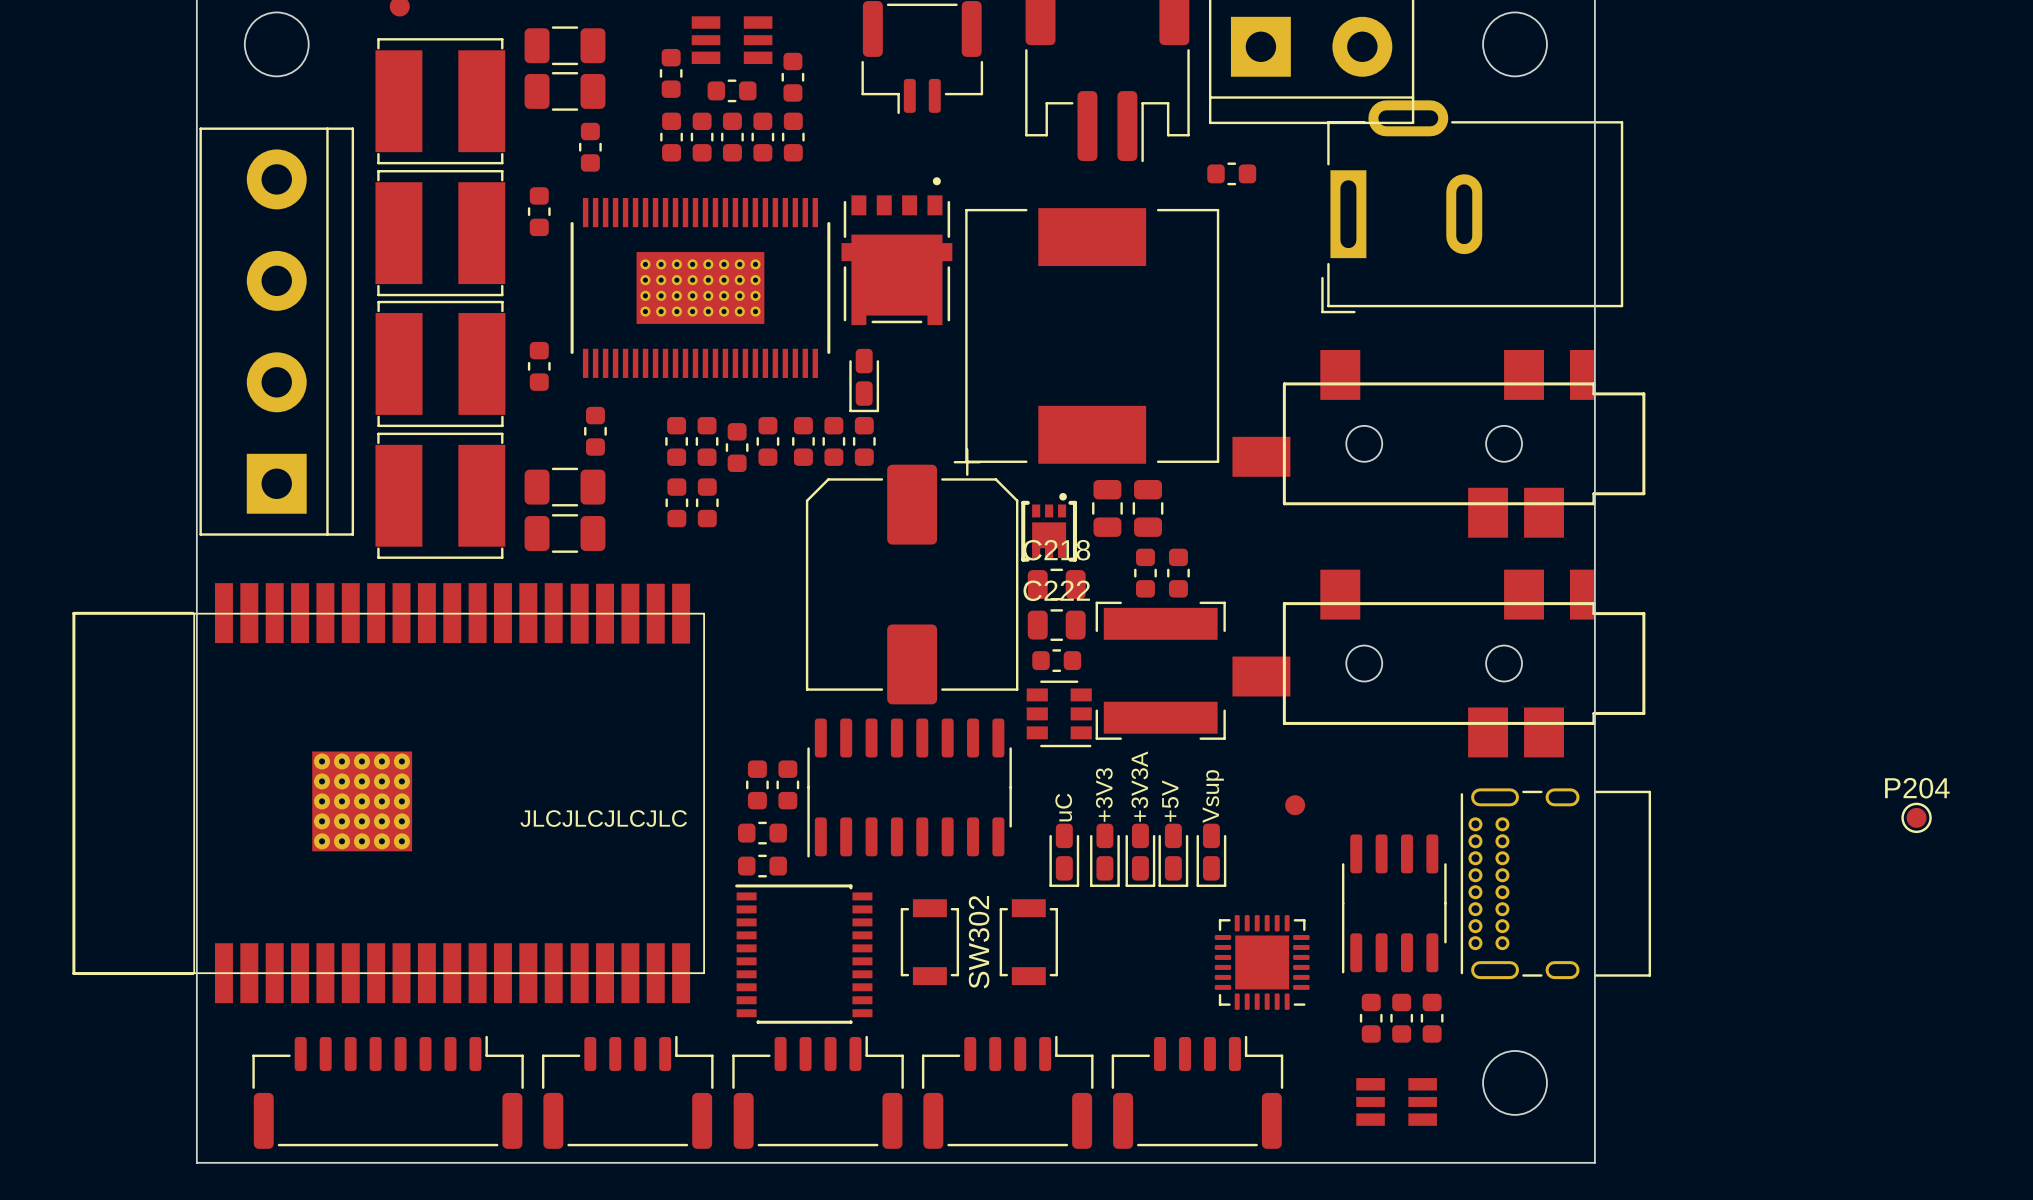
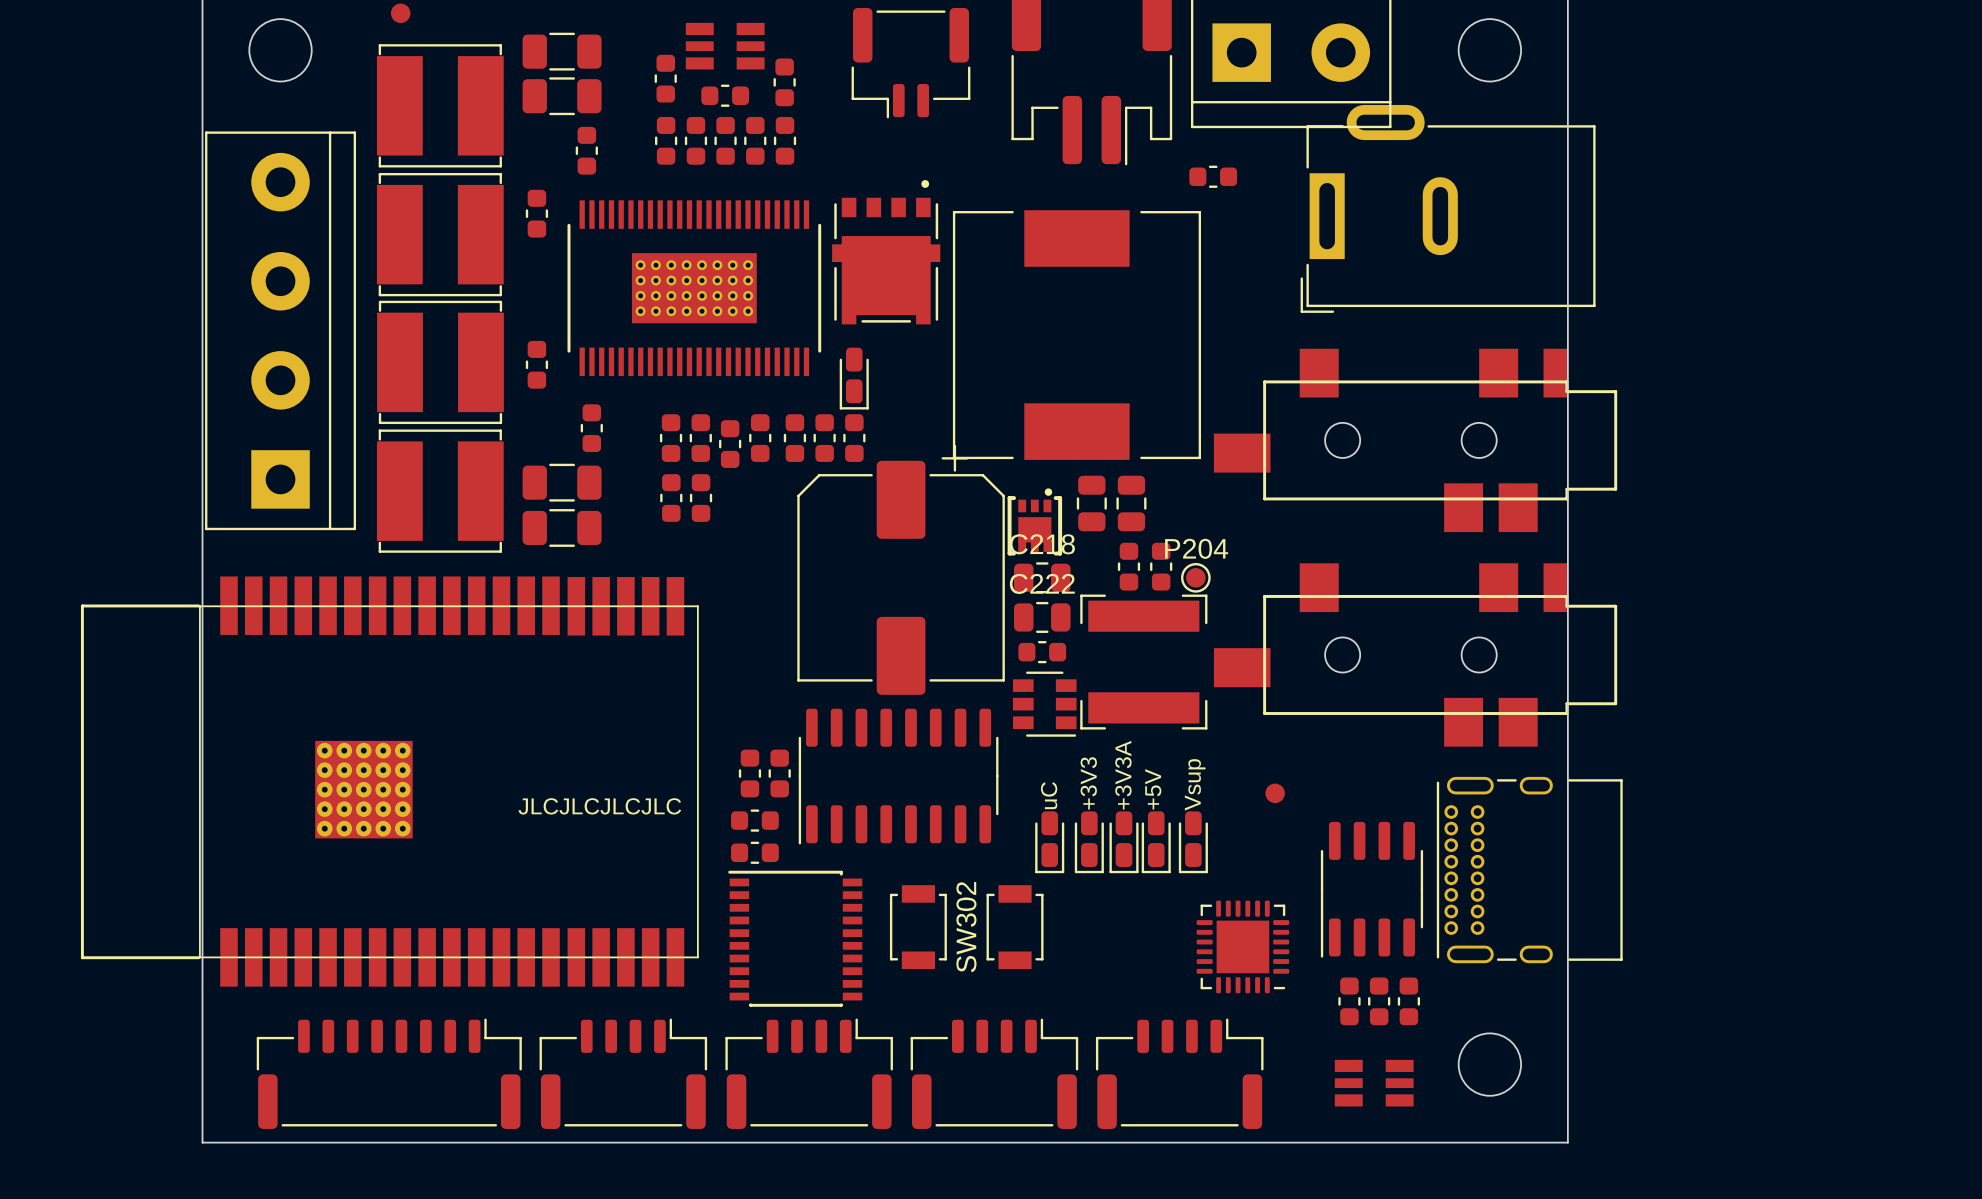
P204 position: (1916, 817) -> (1195, 577)

